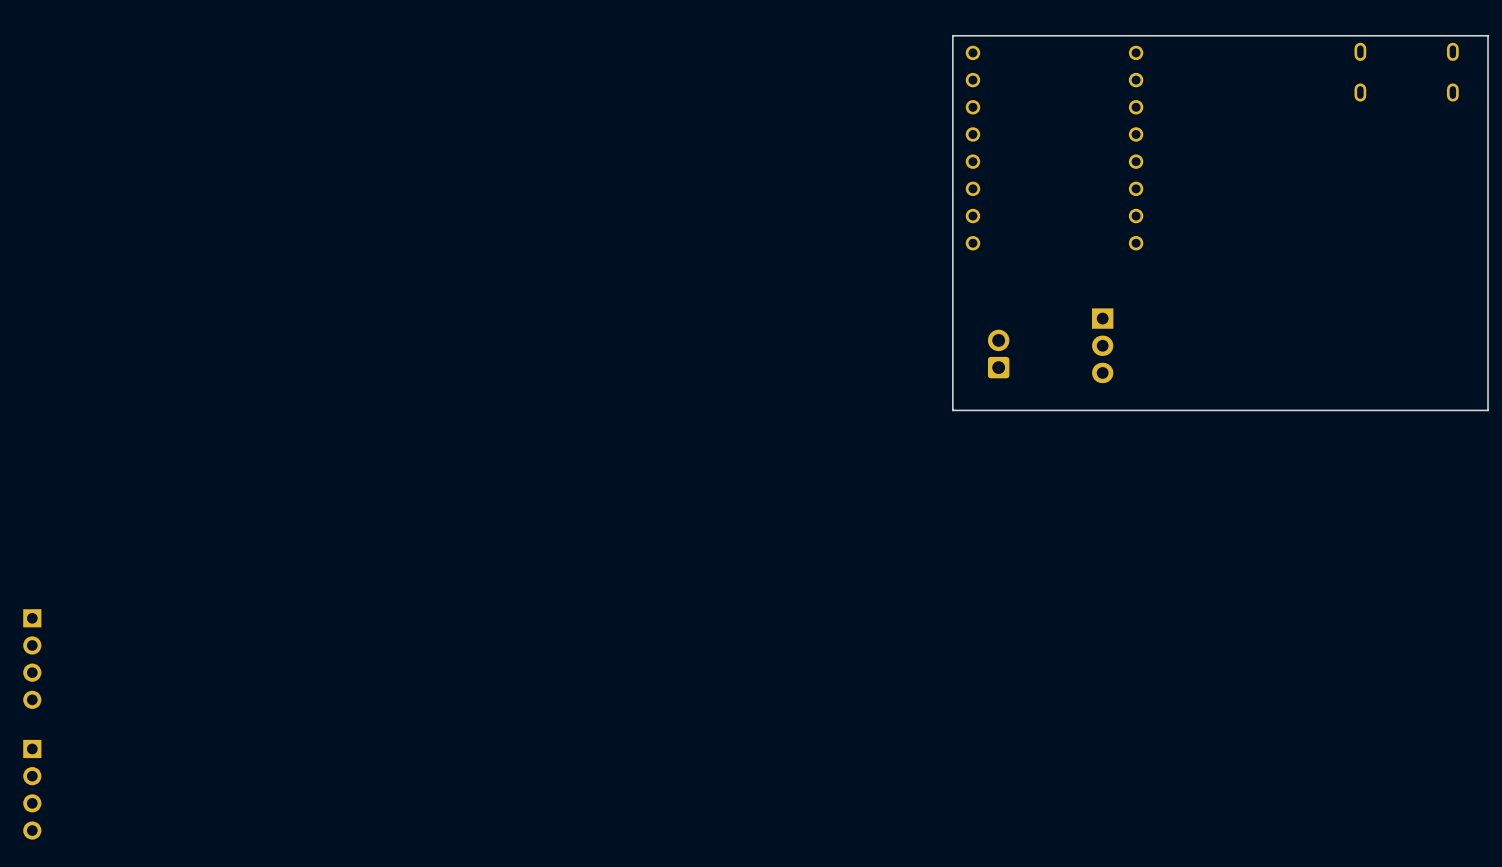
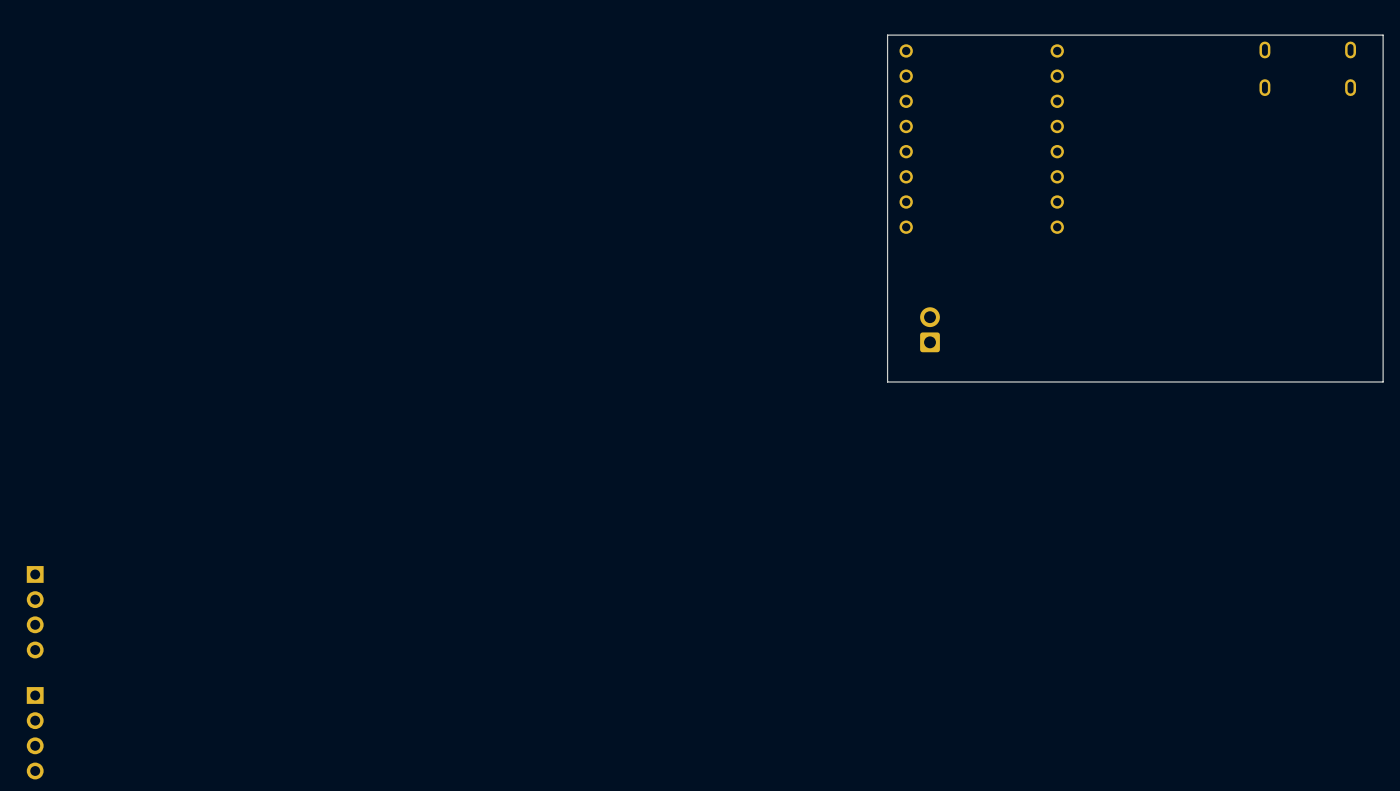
part: (1102, 345) -> none

